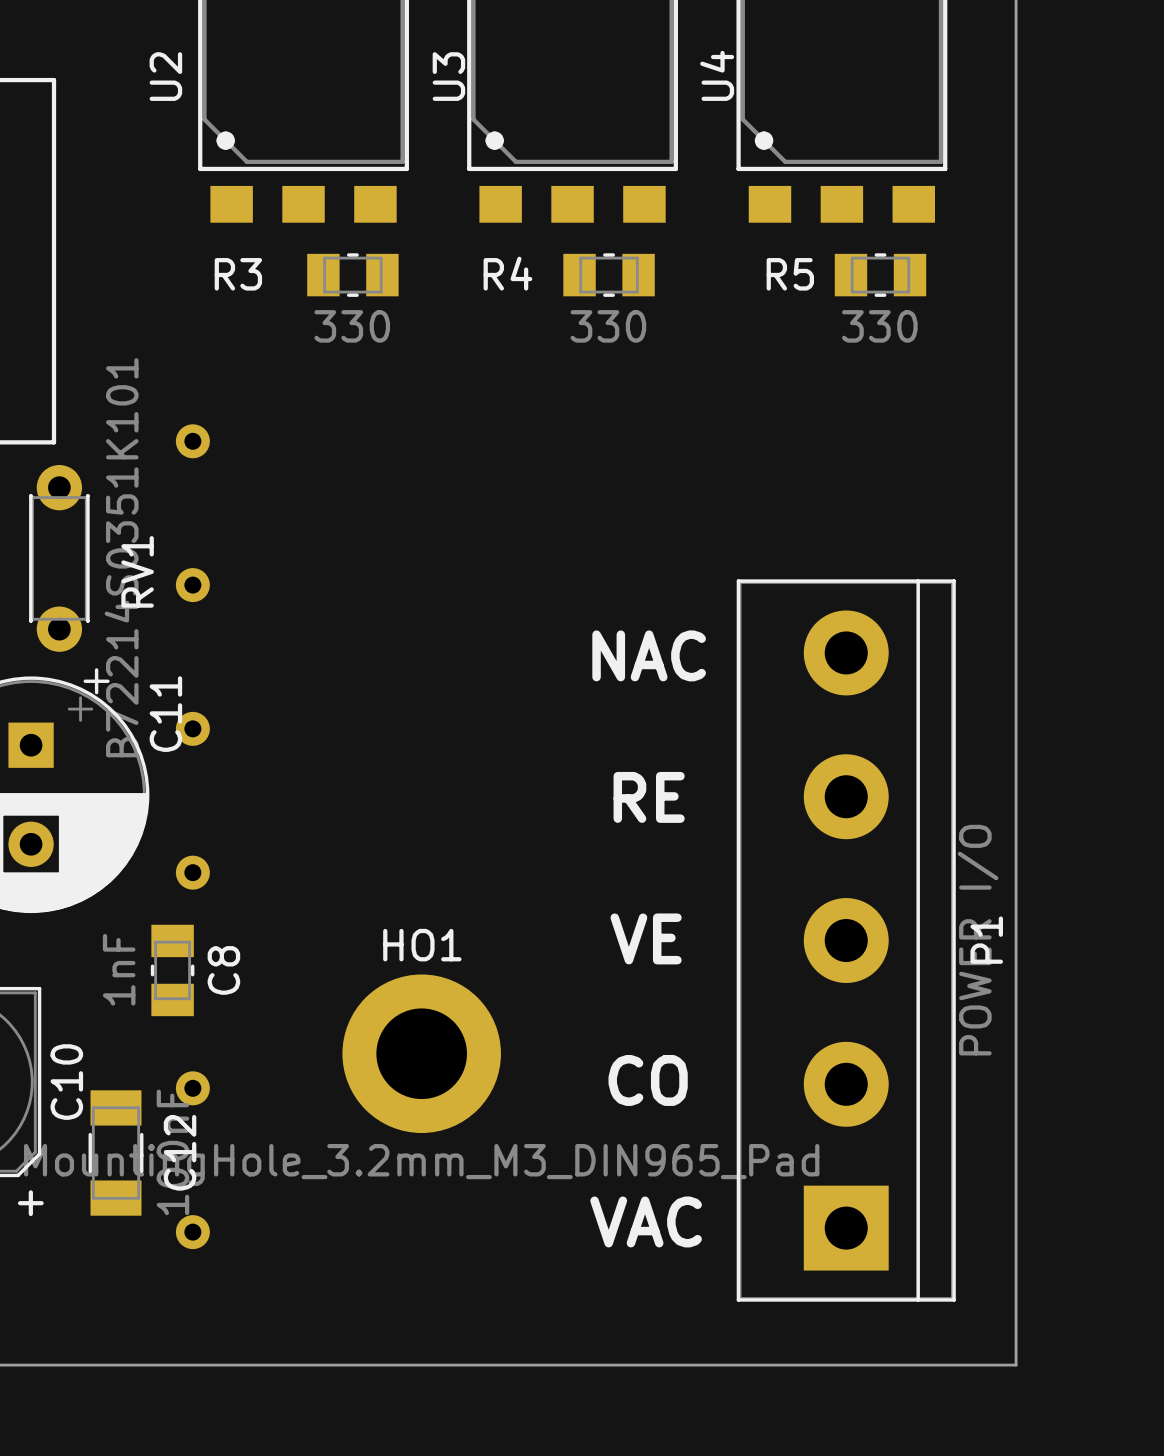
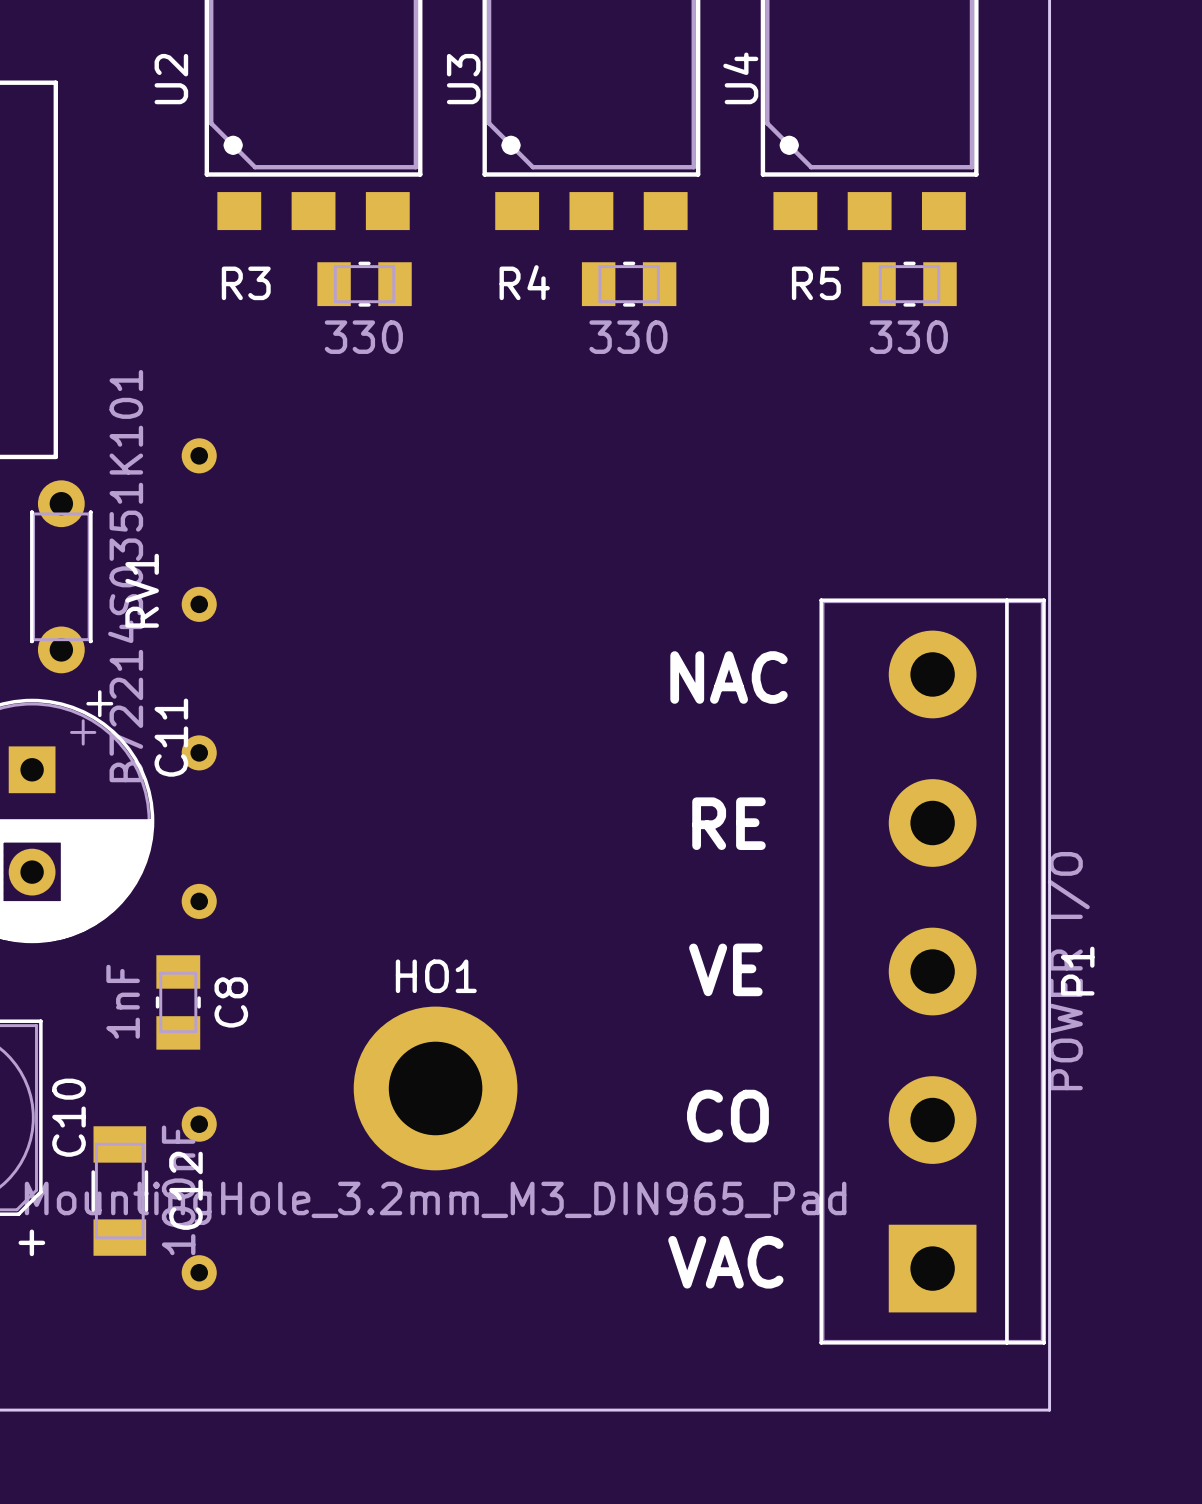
text position: NAC (649, 655) -> NAC (729, 677)
text position: RE (649, 797) -> RE (729, 823)
text position: VE (646, 938) -> VE (725, 969)
P1 position: (846, 940) -> (932, 971)
text position: CO (648, 1080) -> CO (727, 1116)
text position: VAC (646, 1221) -> VAC (725, 1262)

